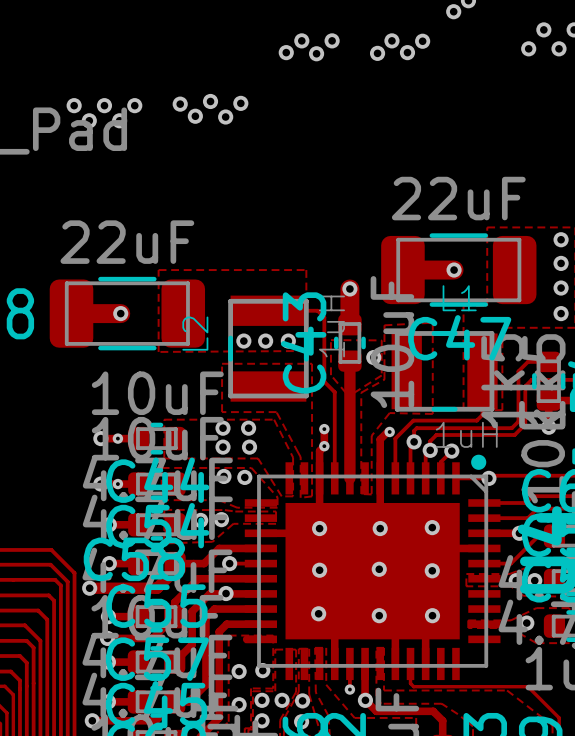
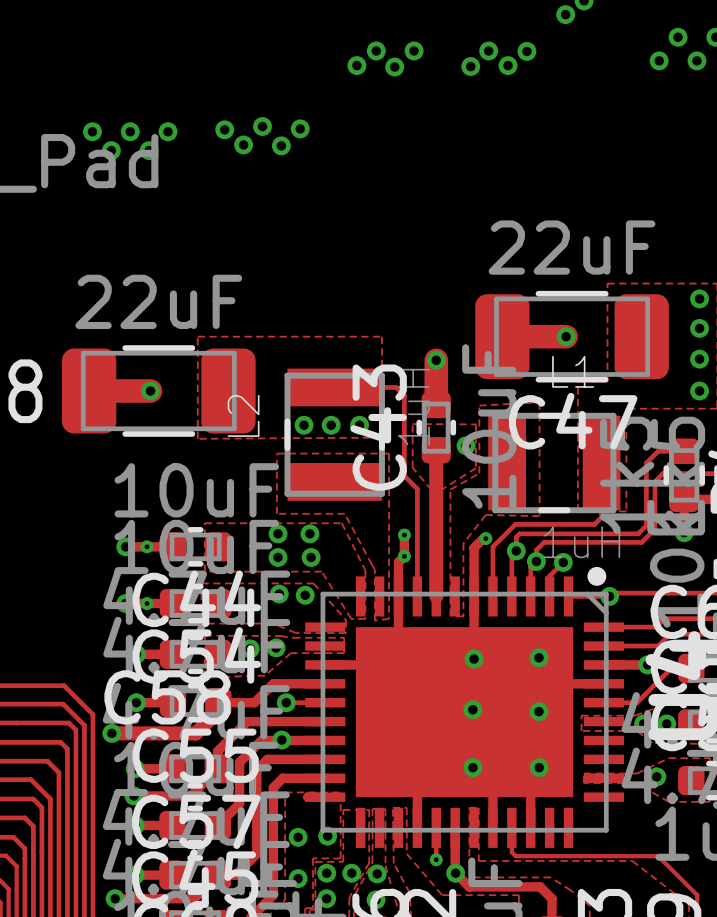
via: (319, 528) -> none
via: (319, 570) -> none
via: (318, 613) -> none

